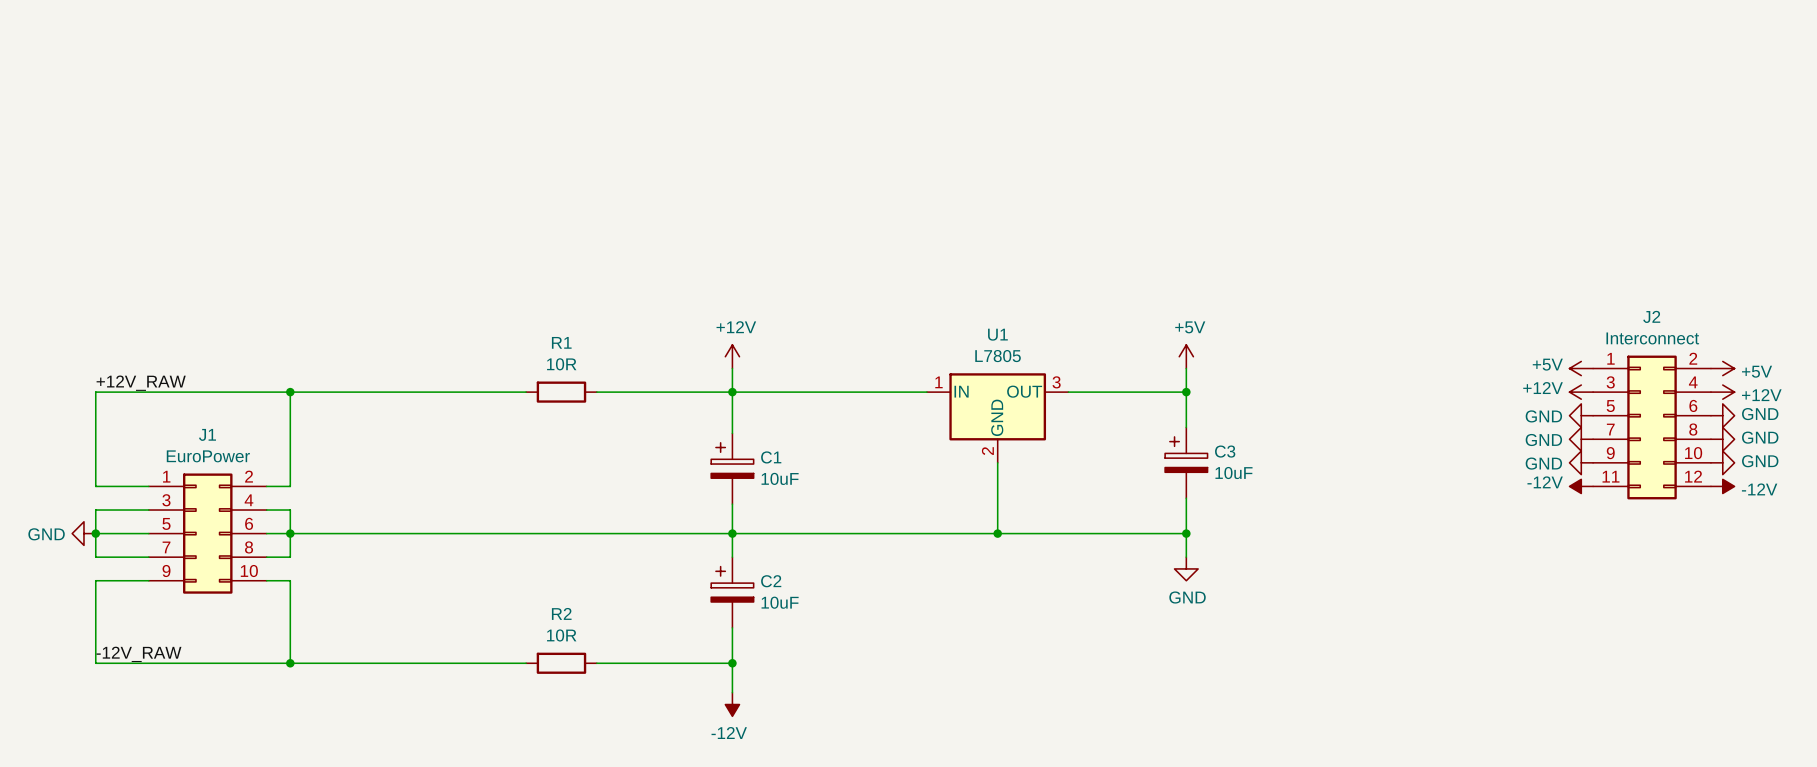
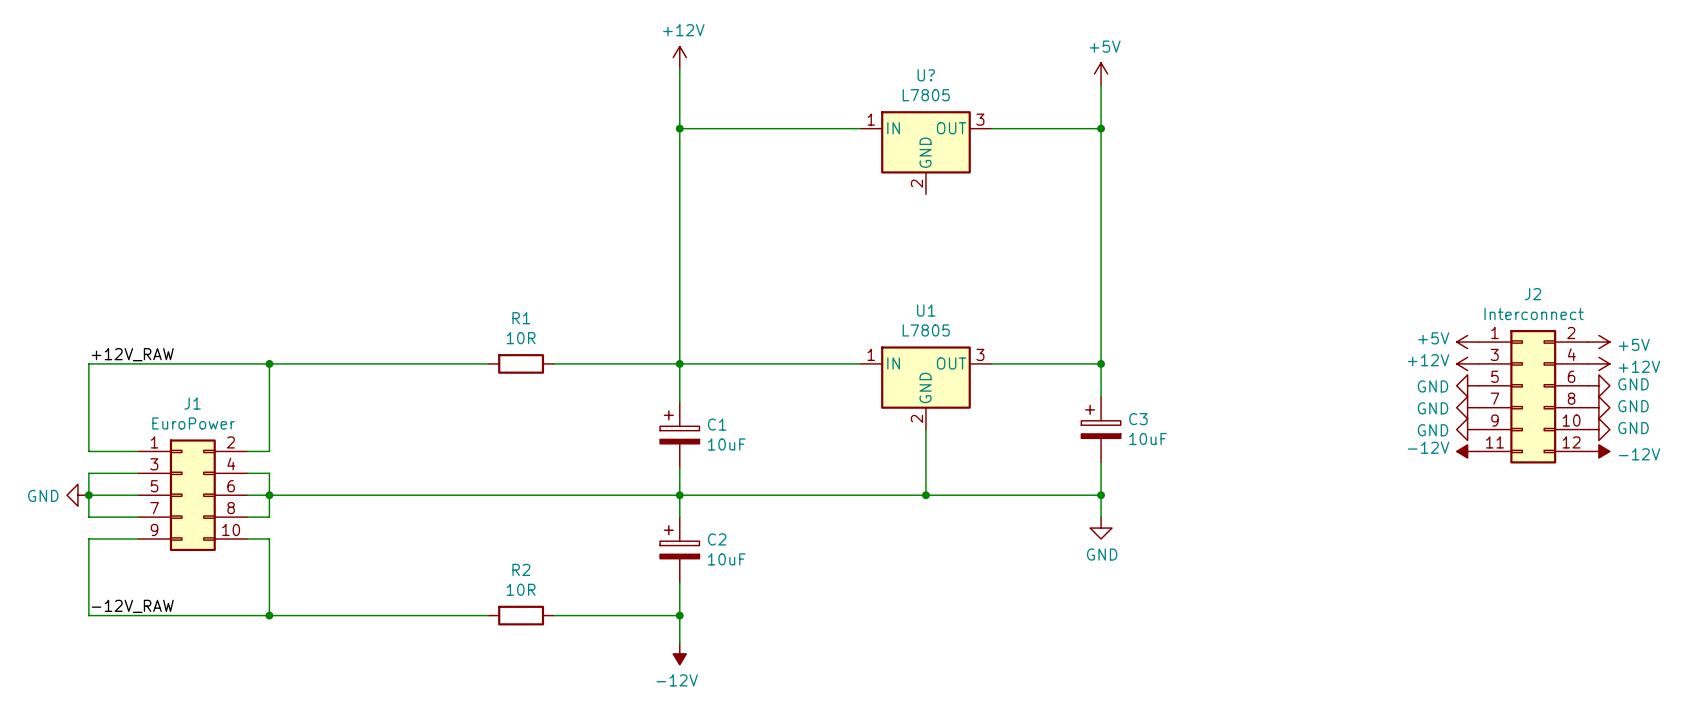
power symbol: none -> +12V (679, 57)
wire: none -> (679, 68) (679, 342)
power symbol: none -> +5V (1101, 73)
wire: none -> (1101, 84) (1101, 342)
wire: none -> (679, 128) (860, 128)
junction: none -> (679, 128)
wire: none -> (991, 128) (1101, 128)
junction: none -> (1101, 128)
U?: none -> L7805 (925, 152)
power symbol: +12V (732, 356) -> none
power symbol: +5V (1186, 356) -> none

